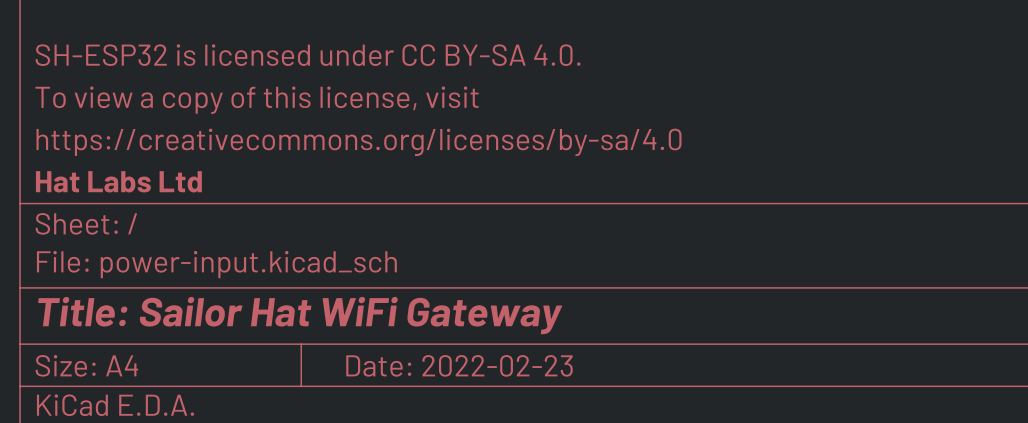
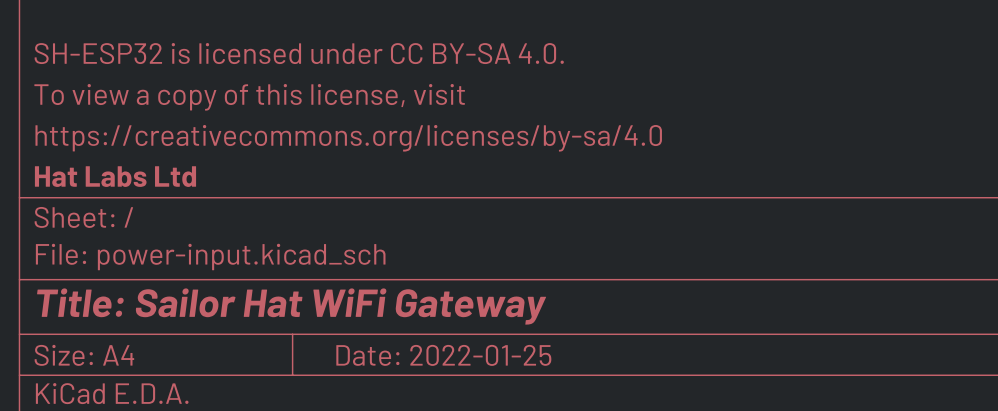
title block: Date: 2022-02-23 (459, 365) -> Date: 2022-01-25 (443, 355)

